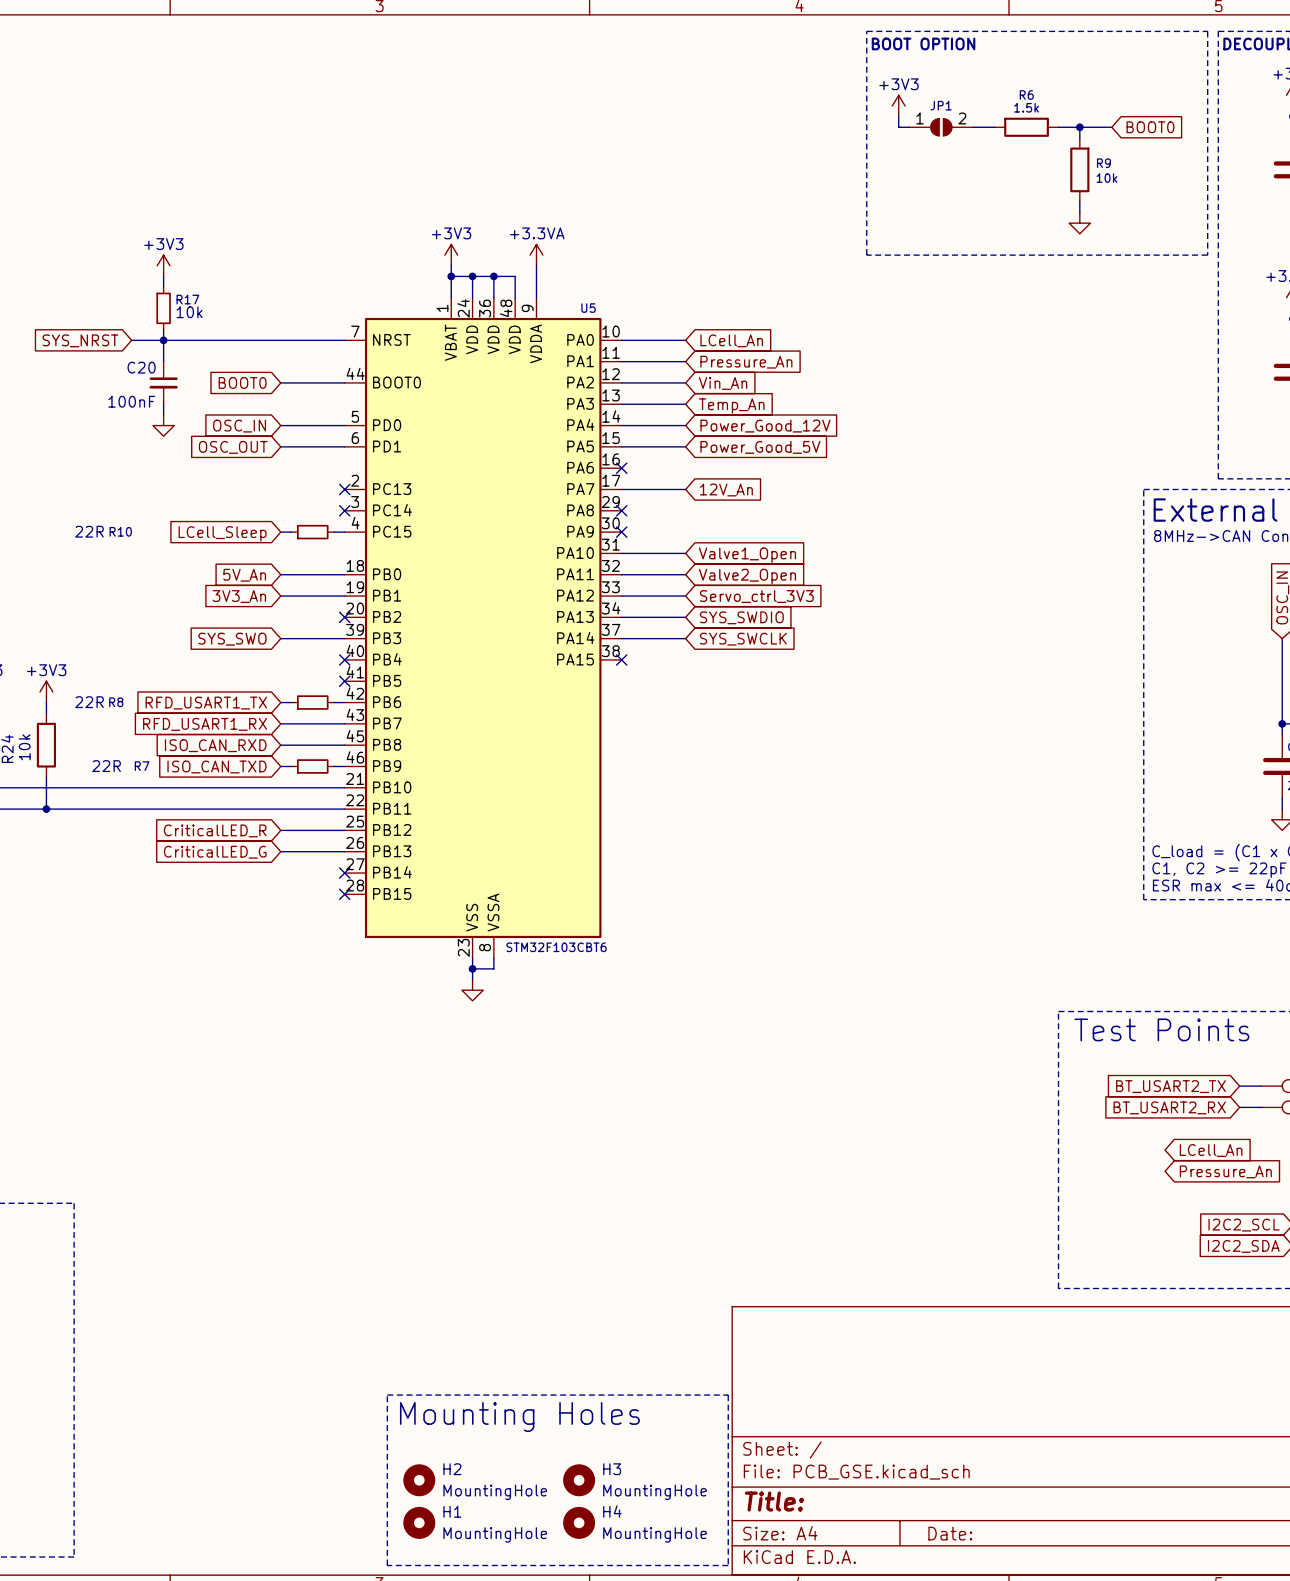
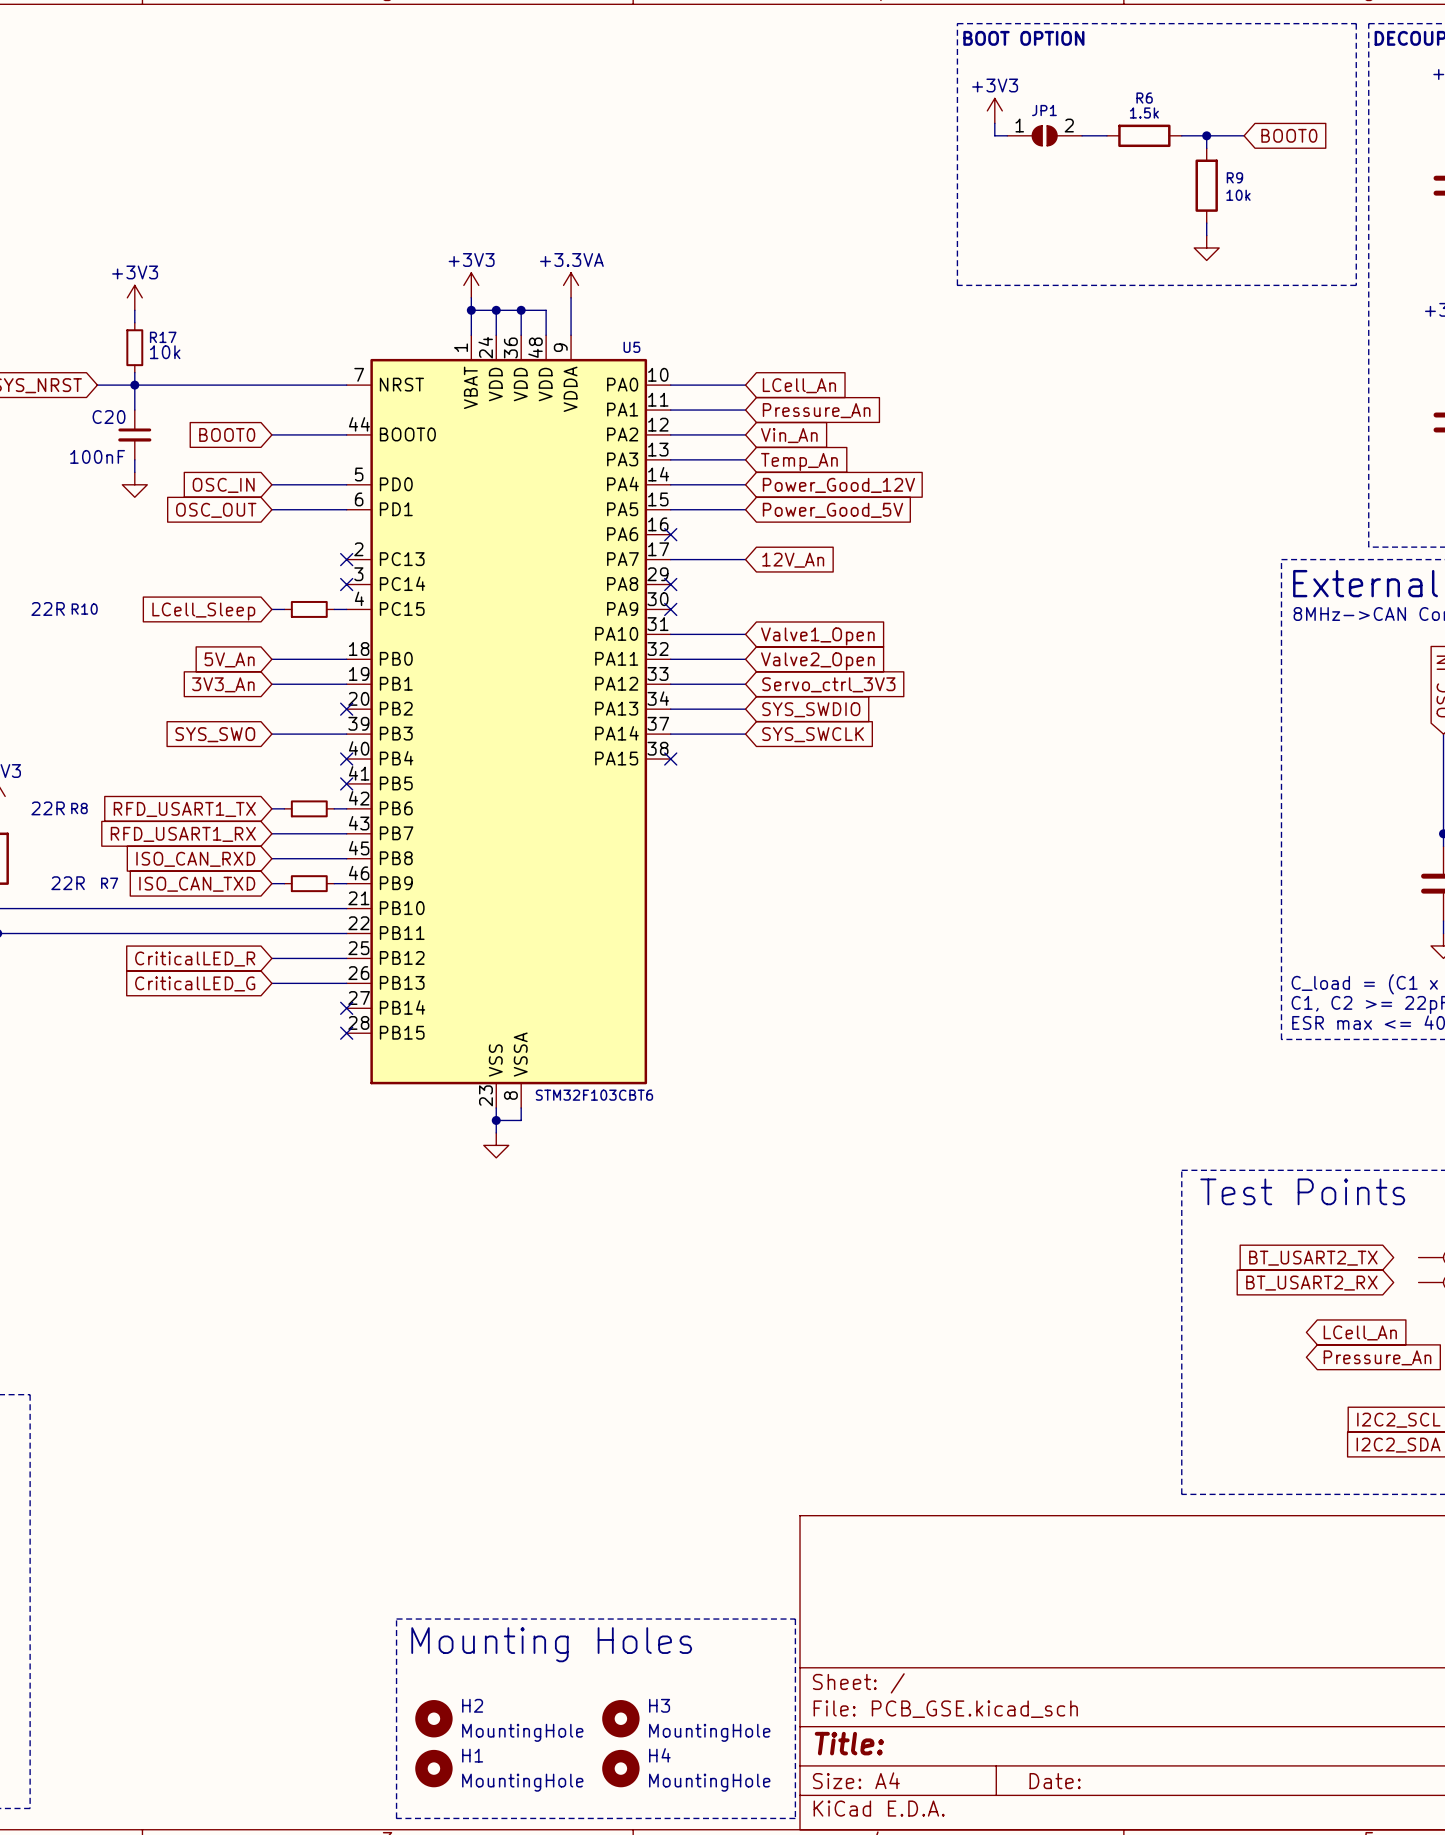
wire: (1239, 1086) (1260, 1086) -> none
wire: (1239, 1107) (1260, 1107) -> none

